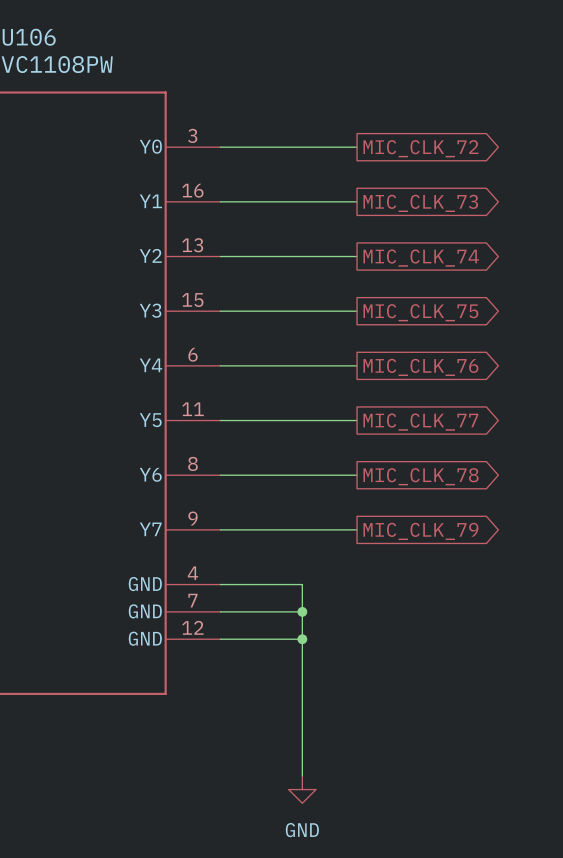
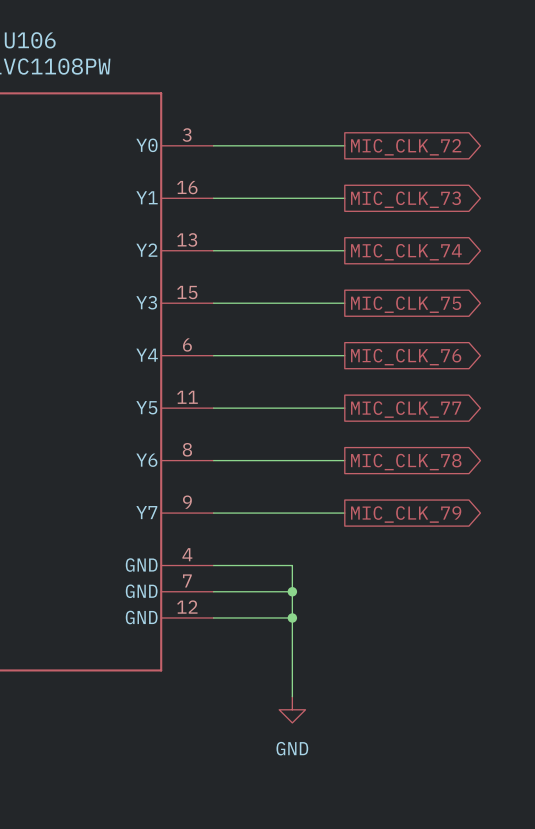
wire: (302, 721) (302, 775) -> none
power symbol position: GND (302, 789) -> GND (292, 709)

